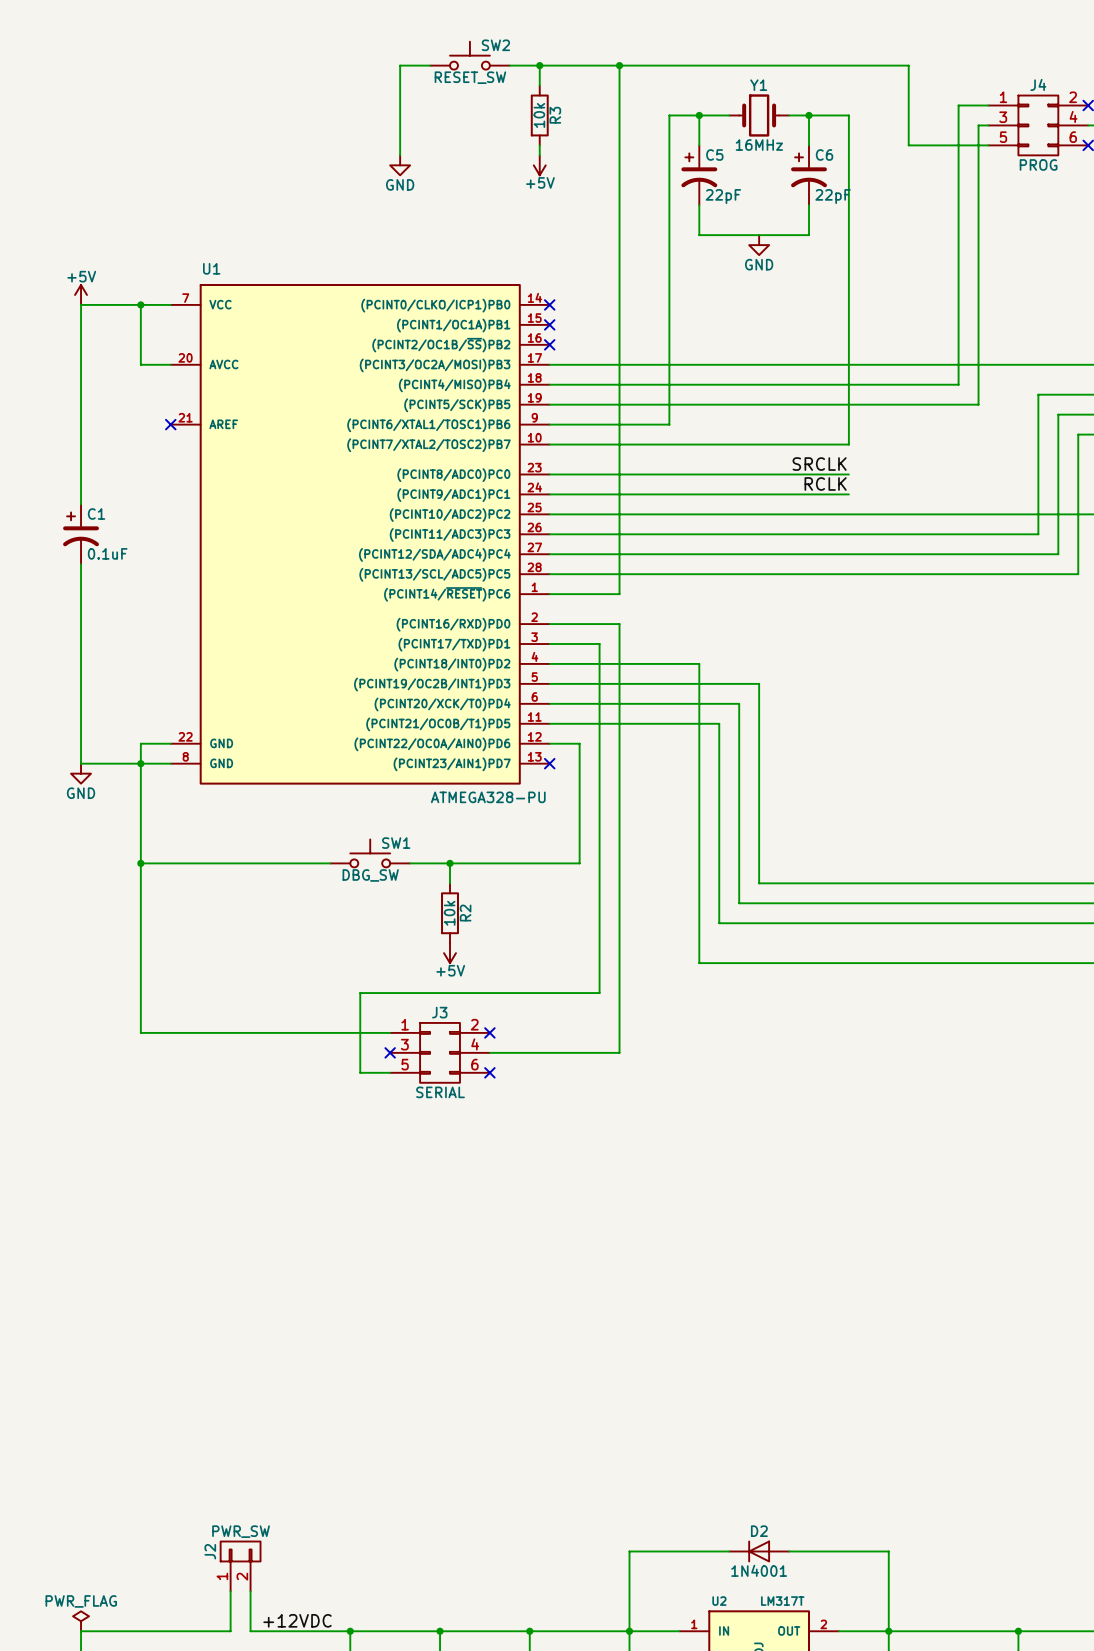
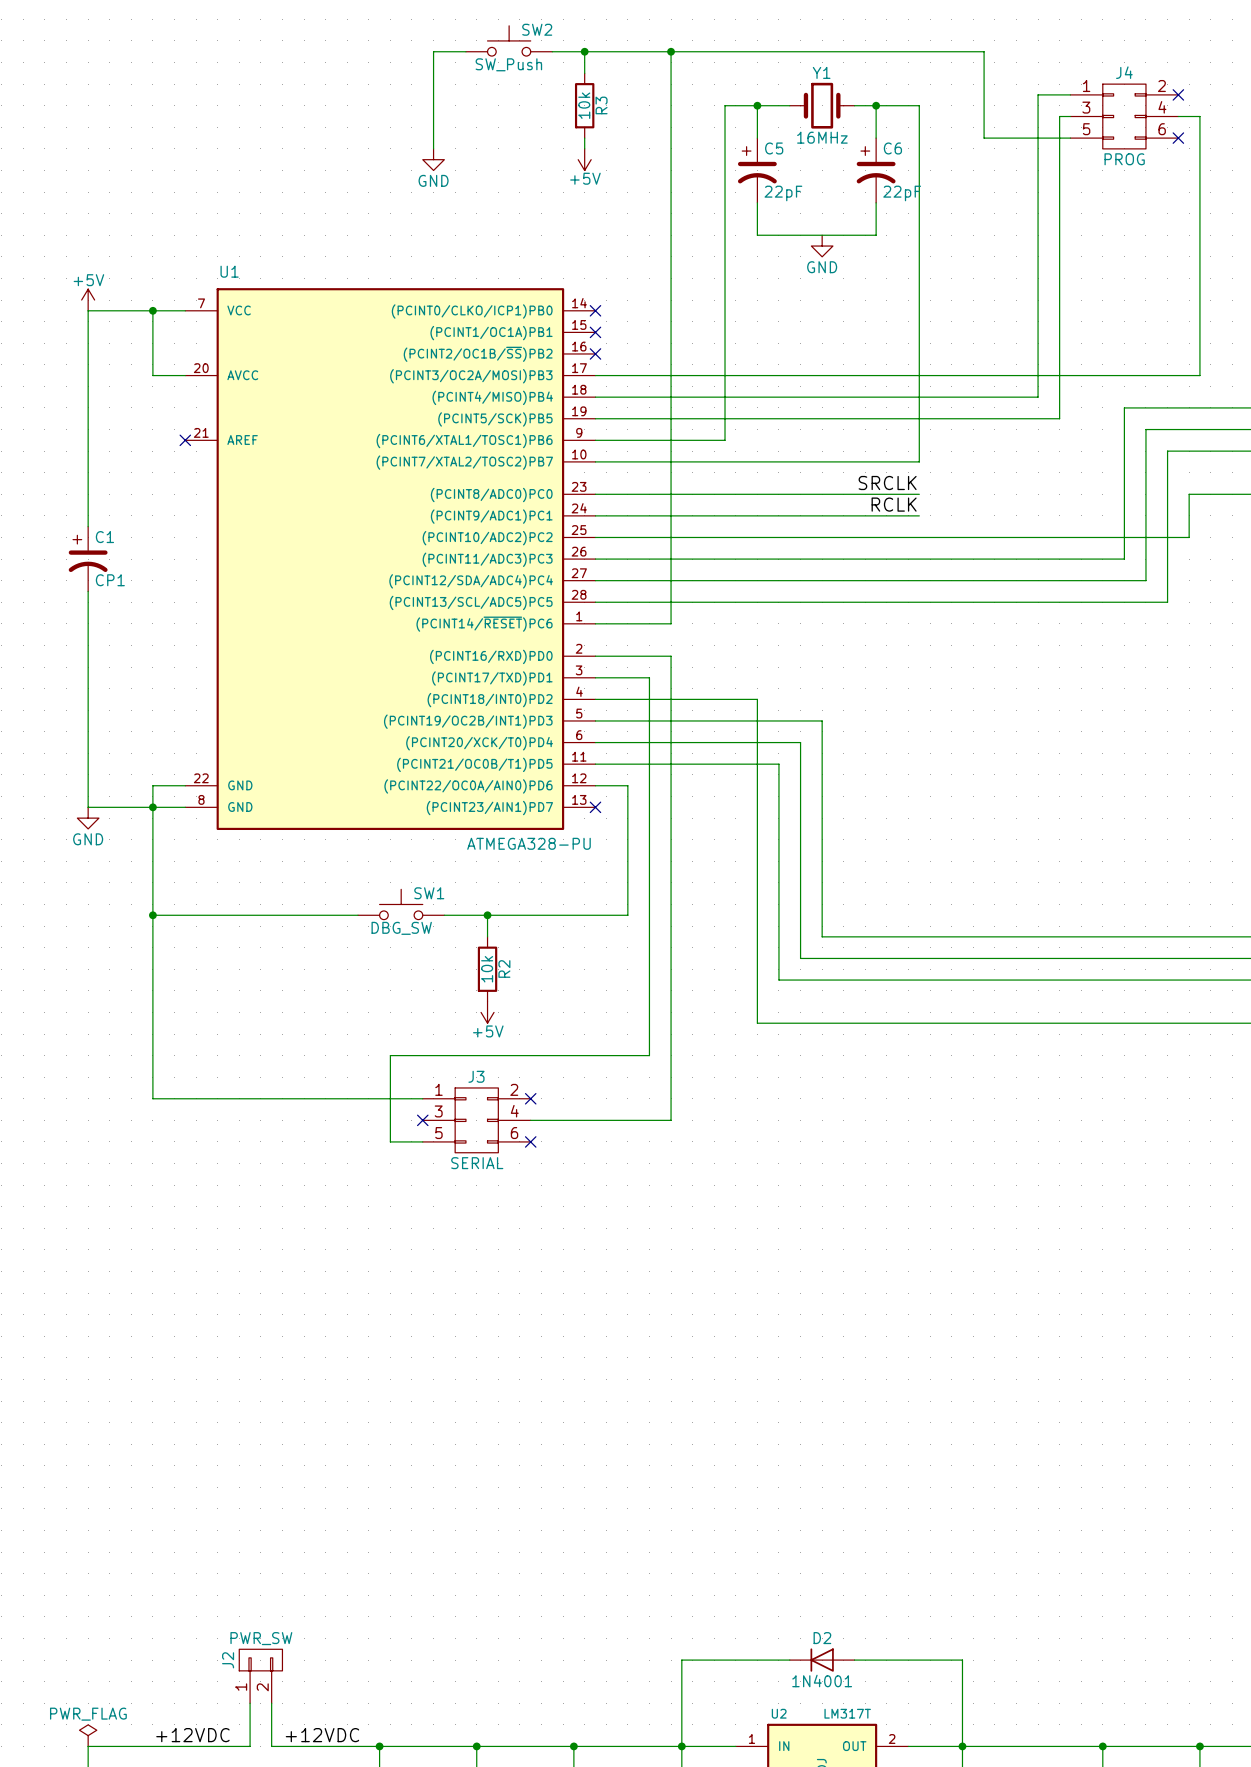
SW2 value: RESET_SW (470, 77) -> SW_Push (508, 64)
C1 value: 0.1uF (107, 553) -> CP1 (110, 580)
label: none -> +12VDC (192, 1735)

